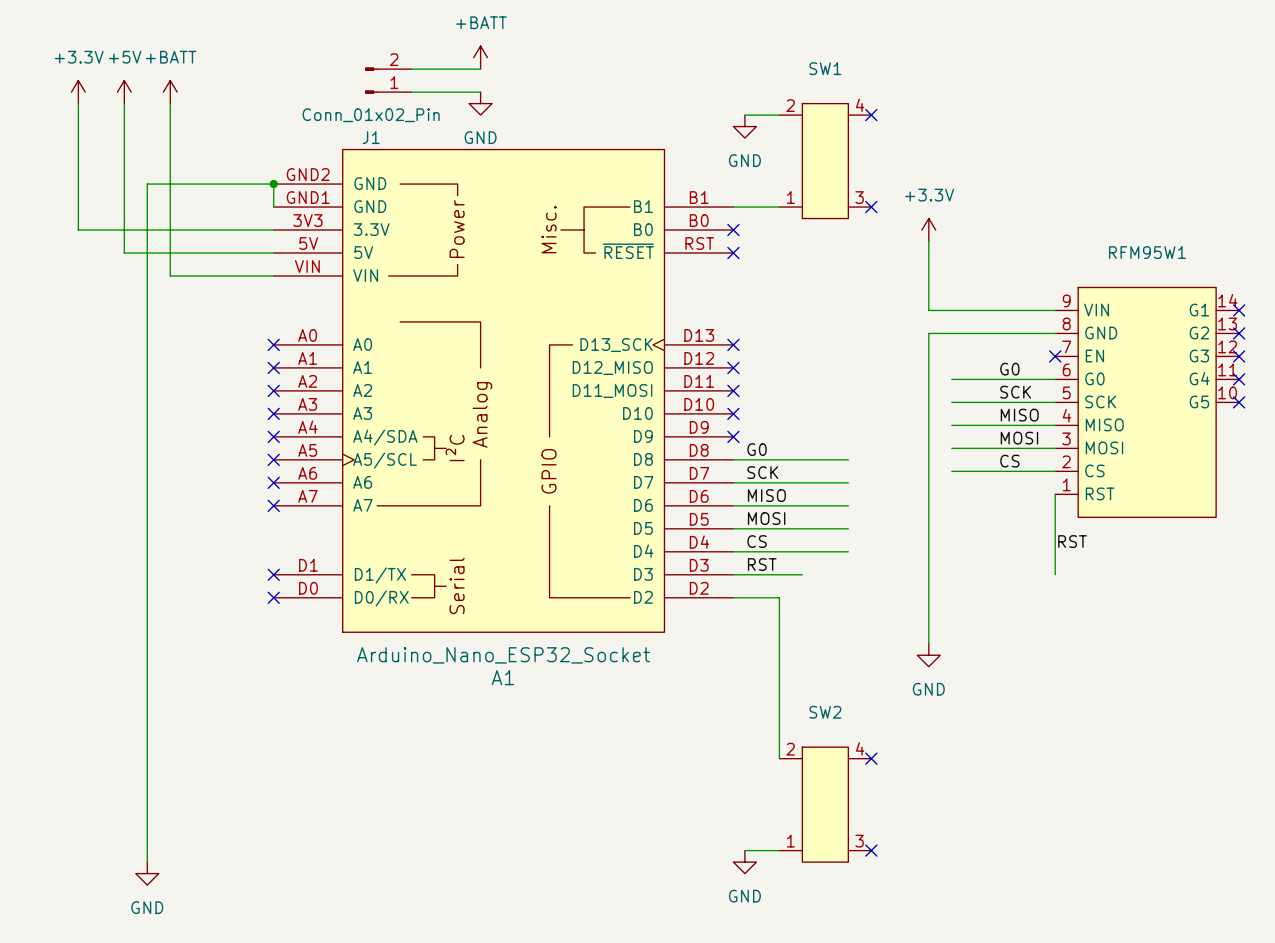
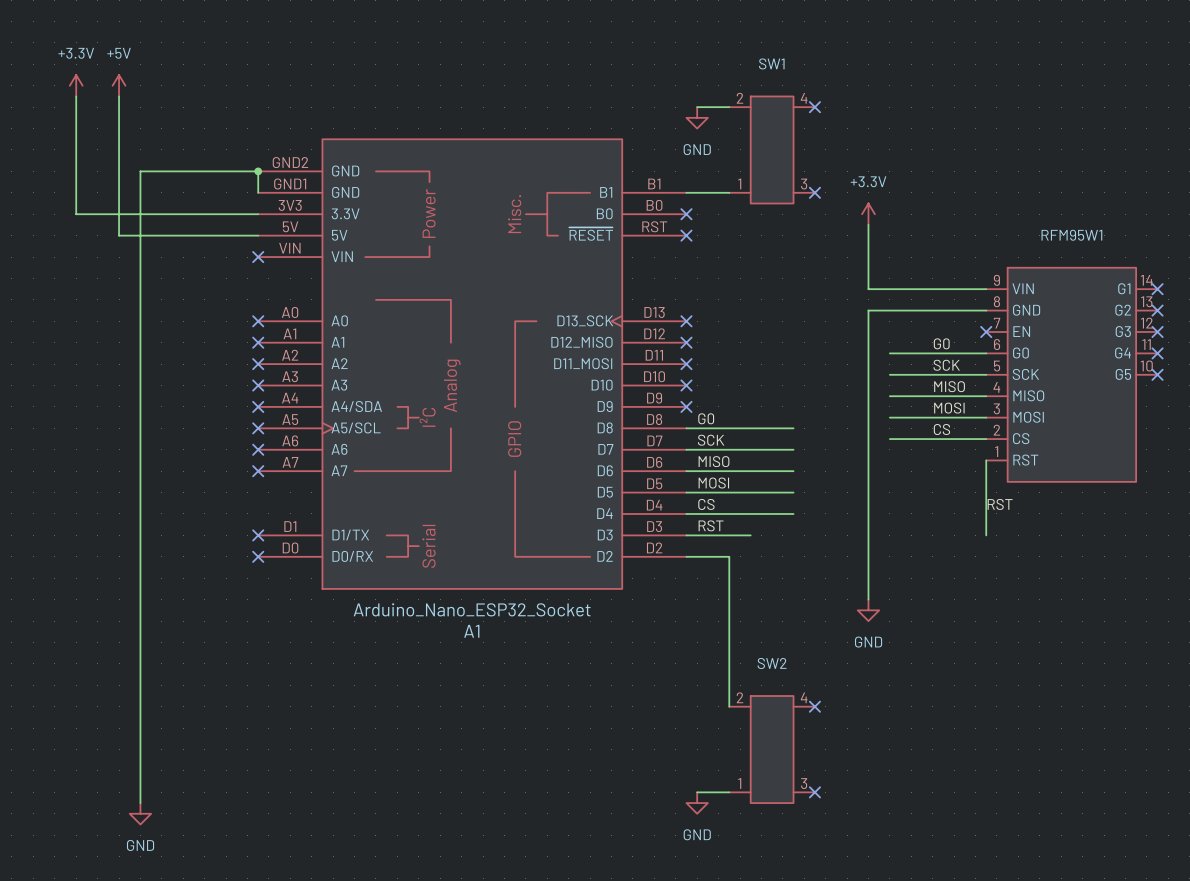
power symbol: +BATT (480, 57) -> none
wire: (411, 69) (480, 69) -> none
J1: Conn_01x02_Pin (388, 80) -> none
power symbol: +BATT (170, 92) -> none
wire: (411, 92) (480, 92) -> none
wire: (170, 103) (170, 275) (273, 275) -> none
power symbol: GND (480, 103) -> none
no-connect mark: none -> (258, 257)

